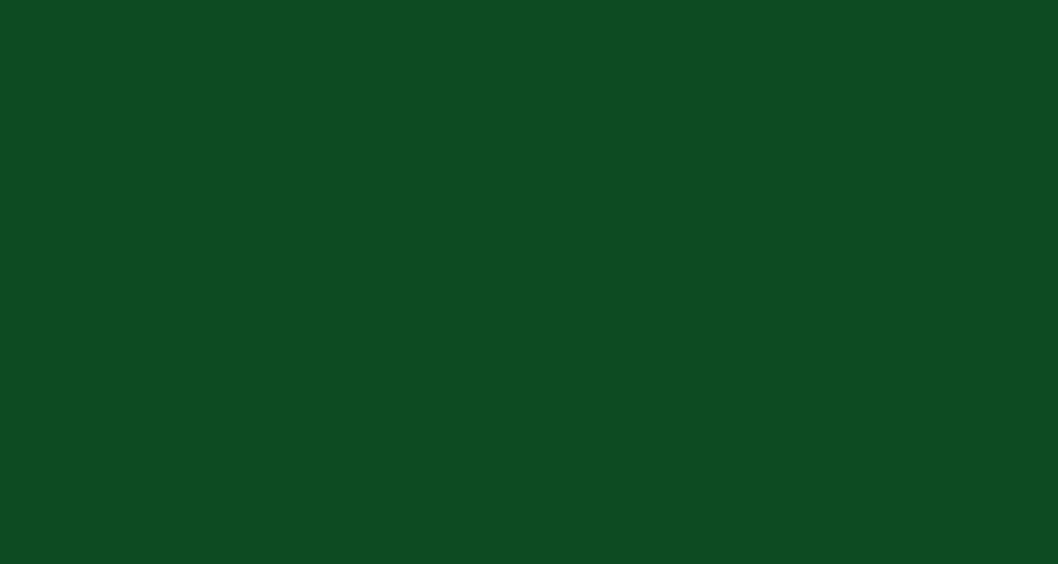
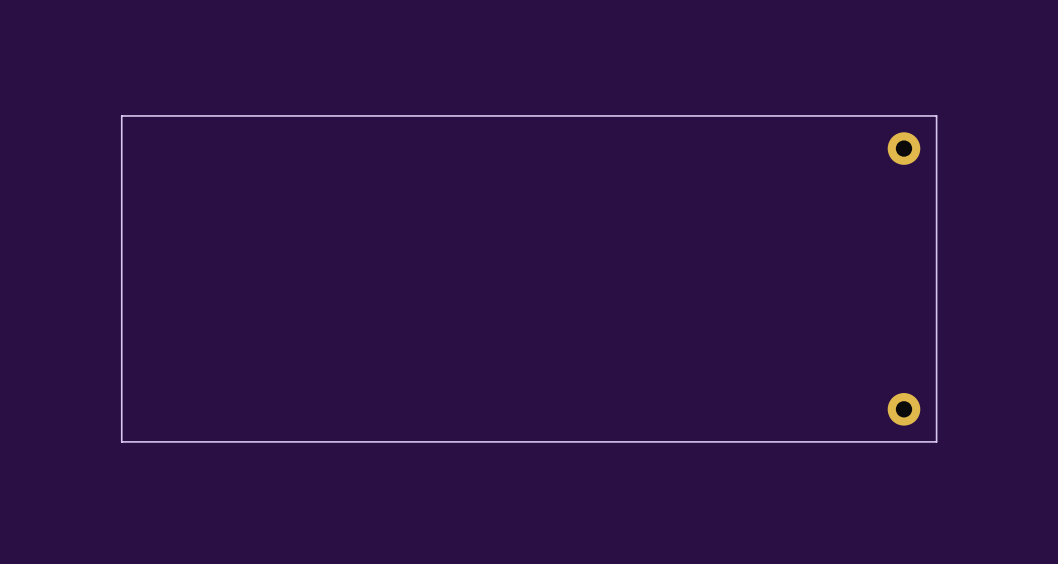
board edge: none -> (936, 115) (121, 115) (121, 441) (936, 441) (936, 115)
part: none -> (903, 148)
part: none -> (903, 409)

